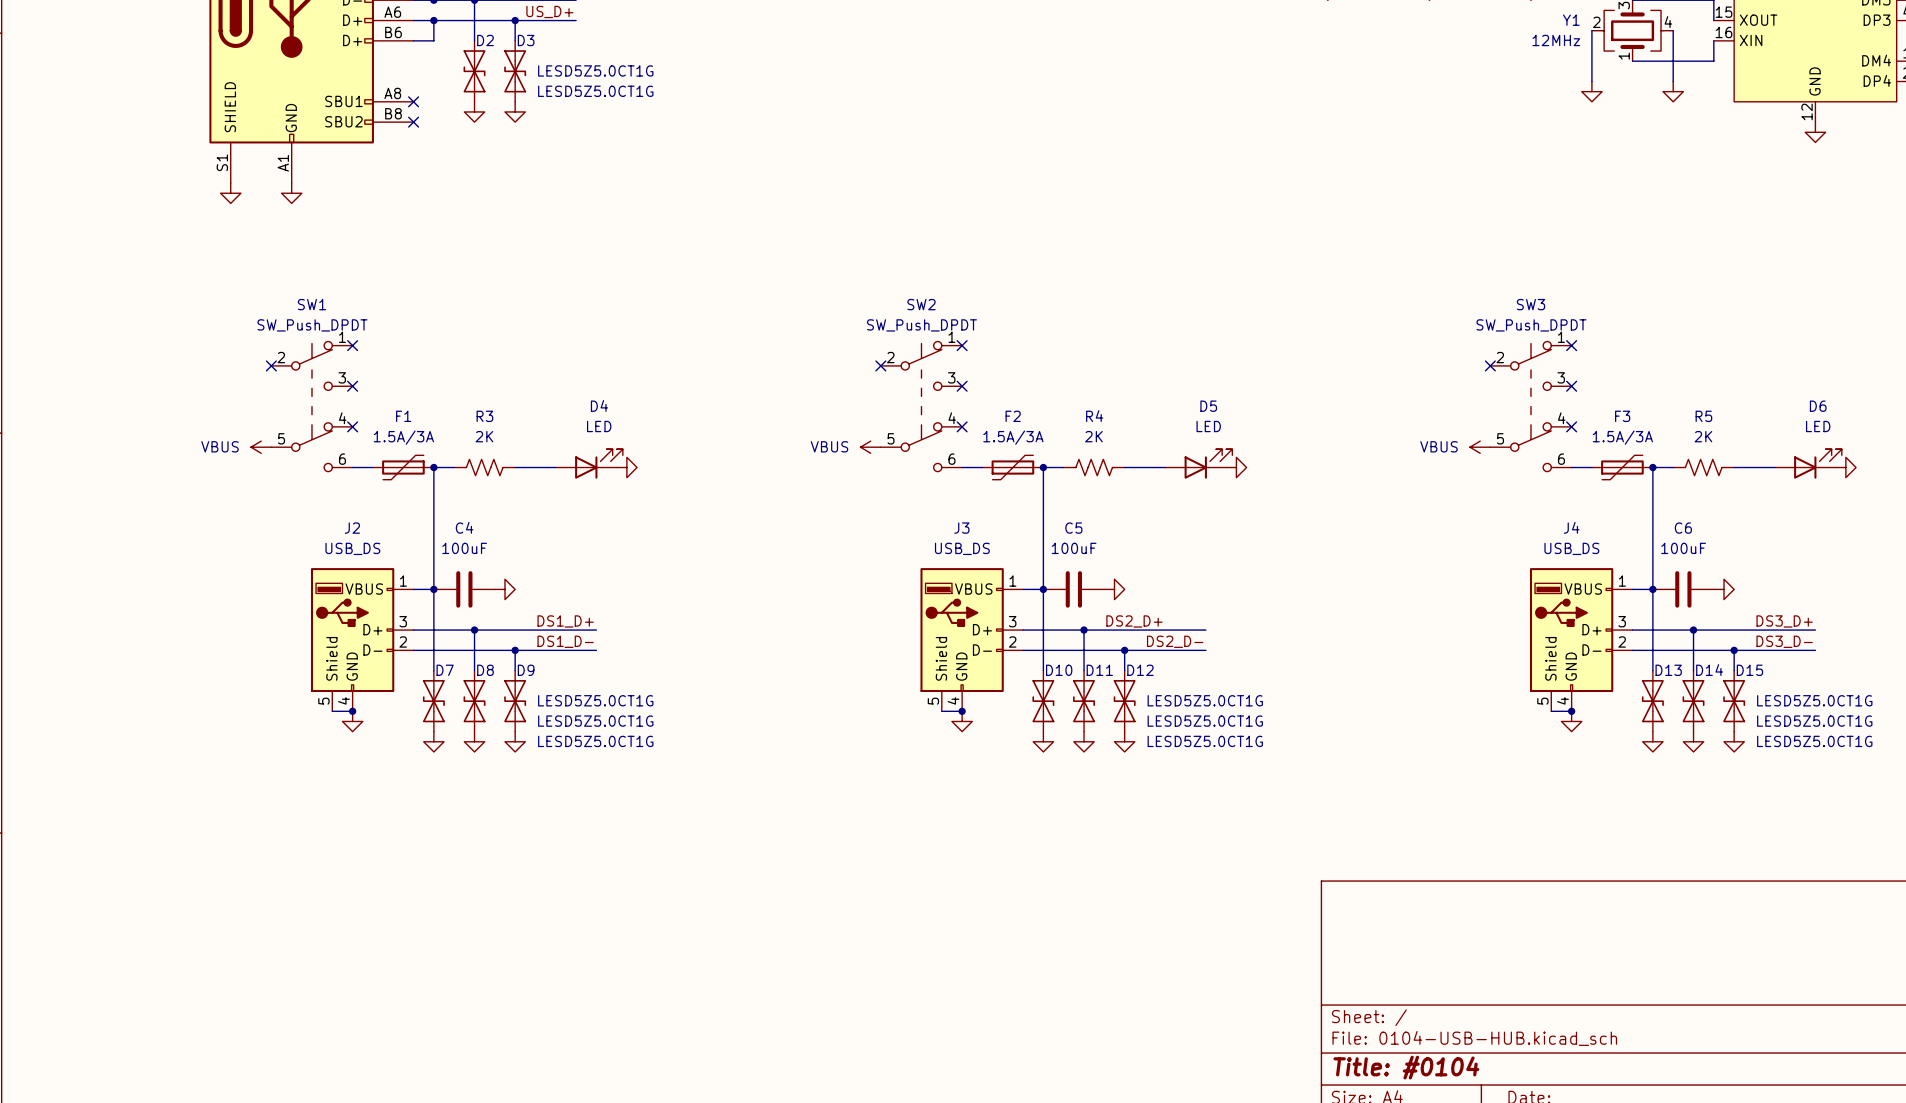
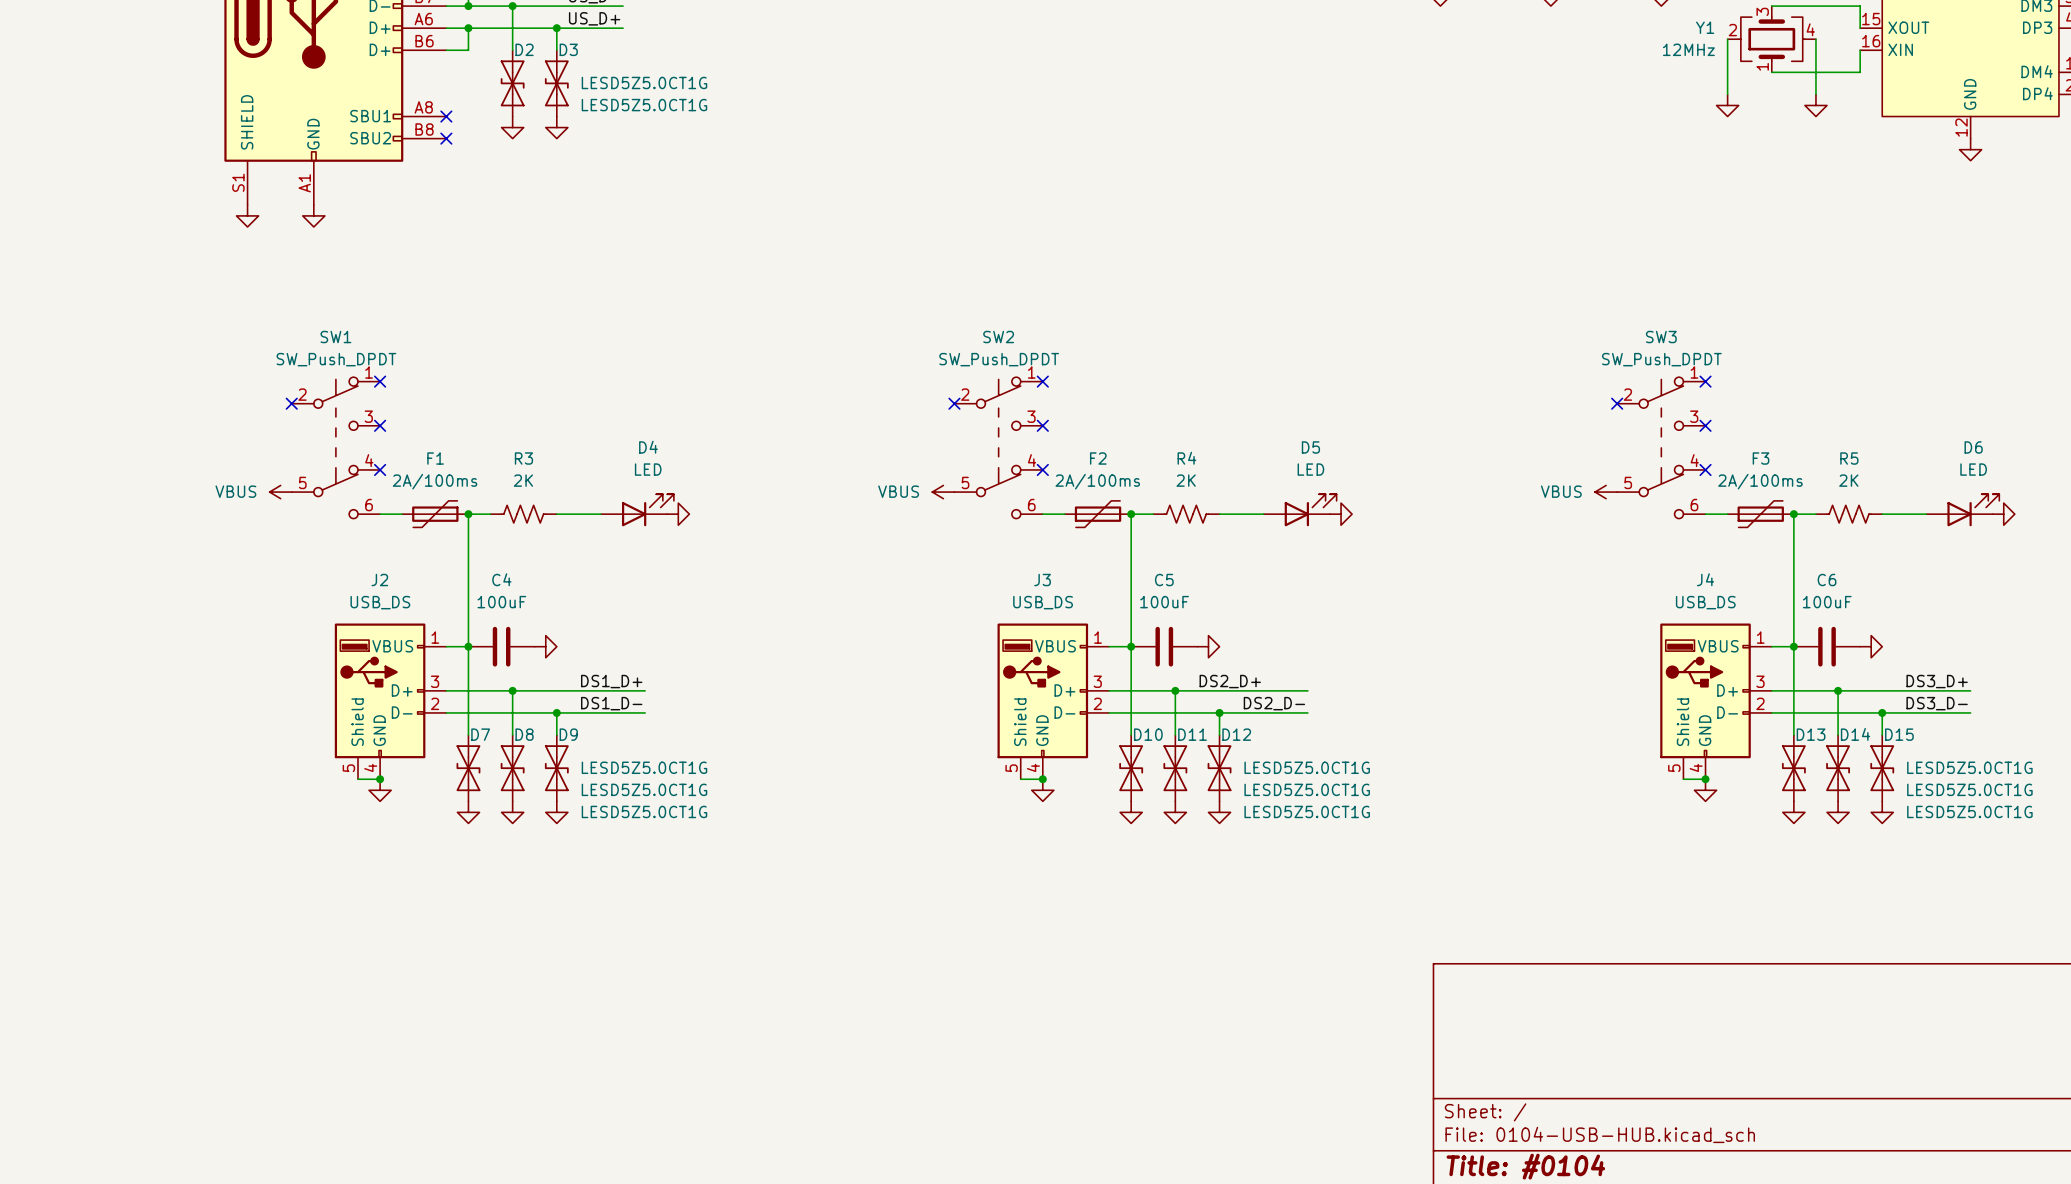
F1 value: 1.5A/3A (403, 437) -> 2A/100ms (435, 481)
F2 value: 1.5A/3A (1013, 437) -> 2A/100ms (1097, 481)
F3 value: 1.5A/3A (1622, 437) -> 2A/100ms (1760, 481)

